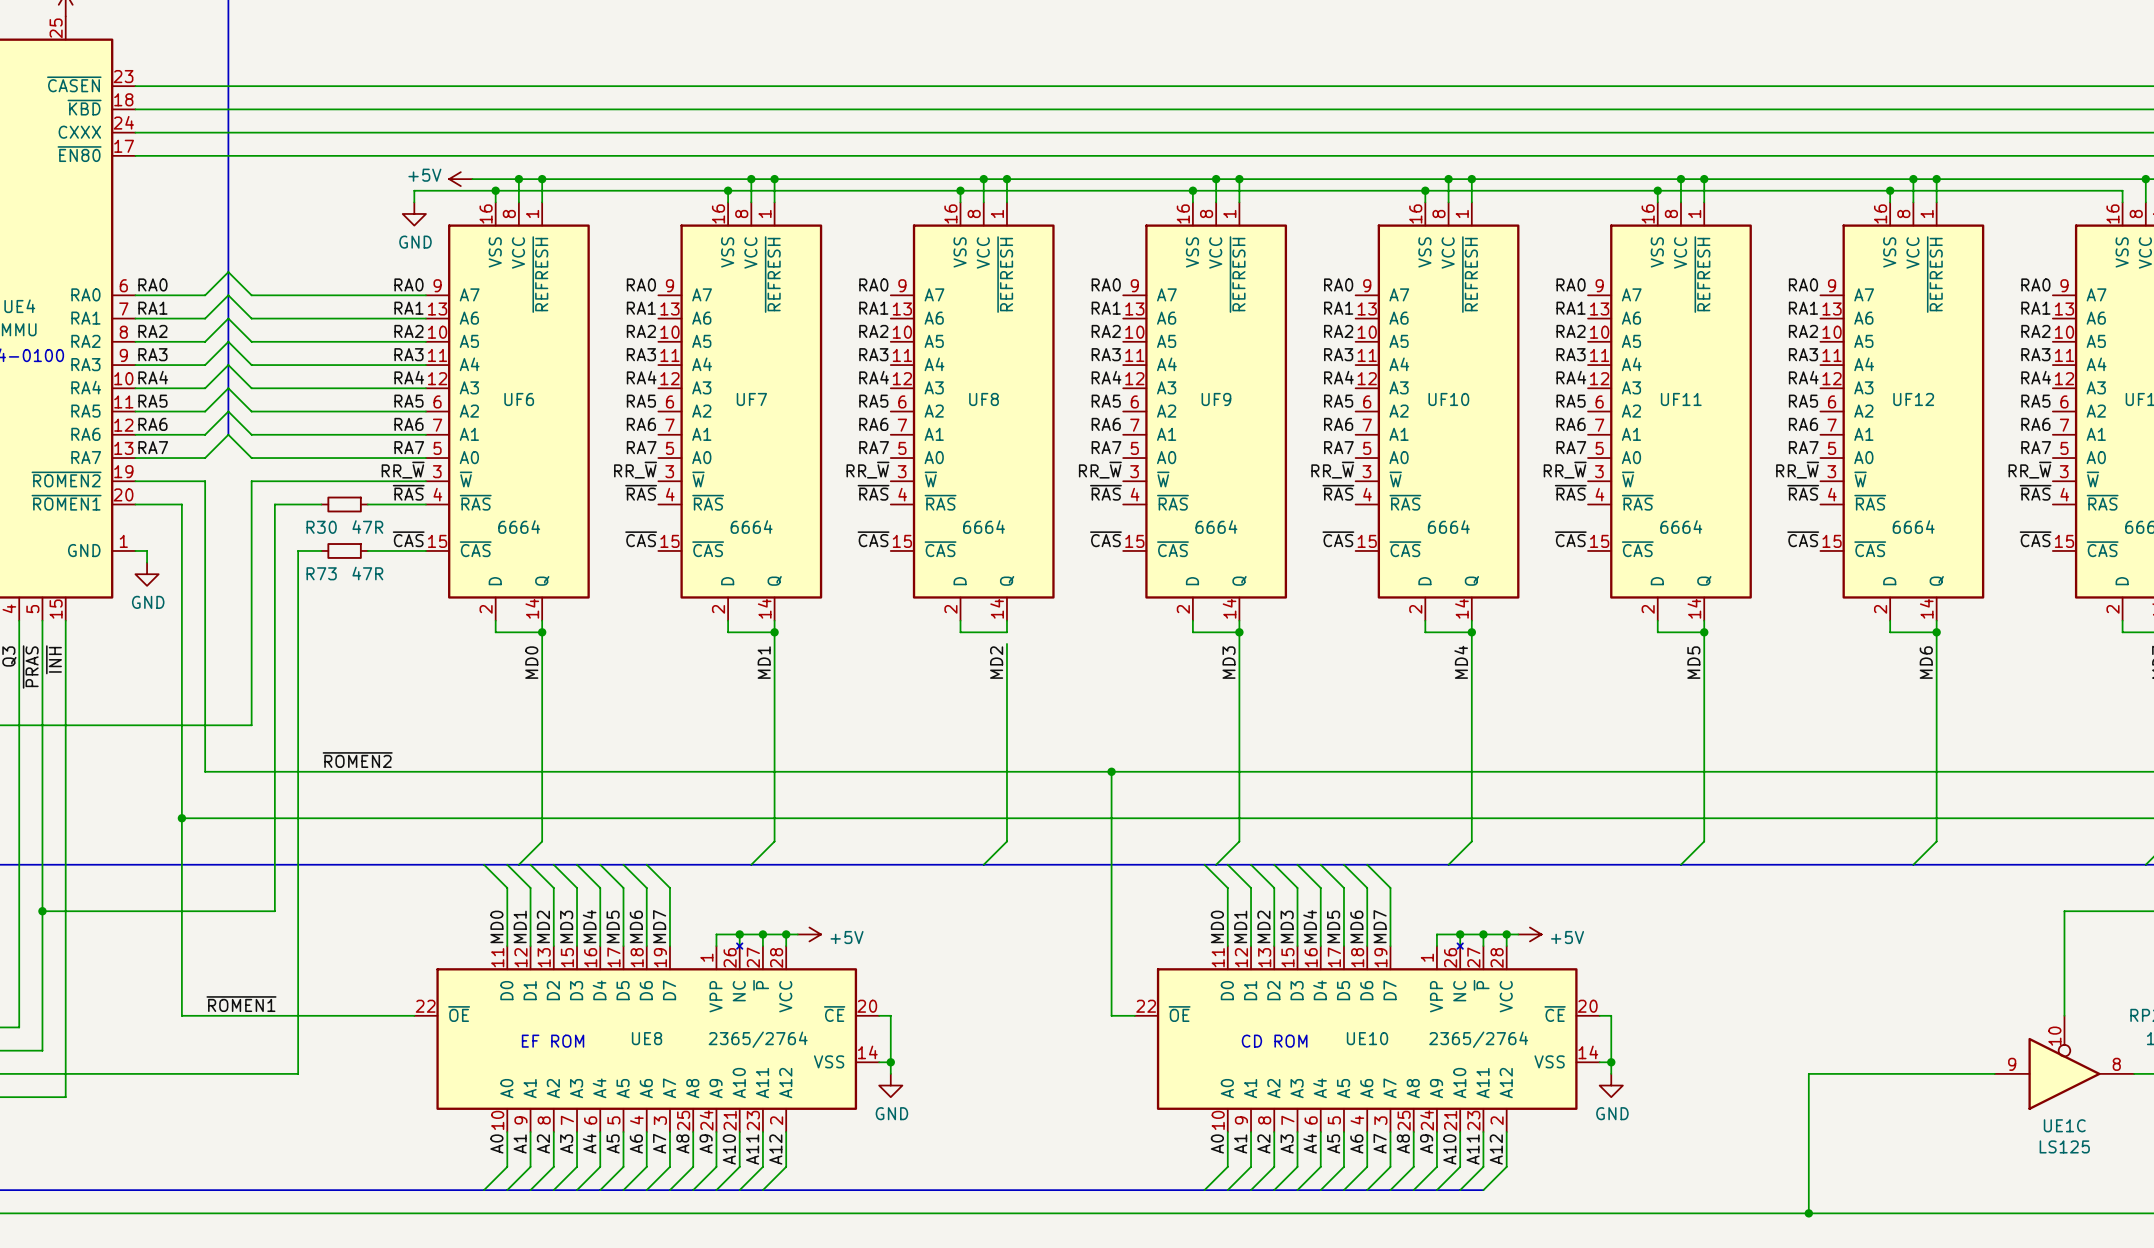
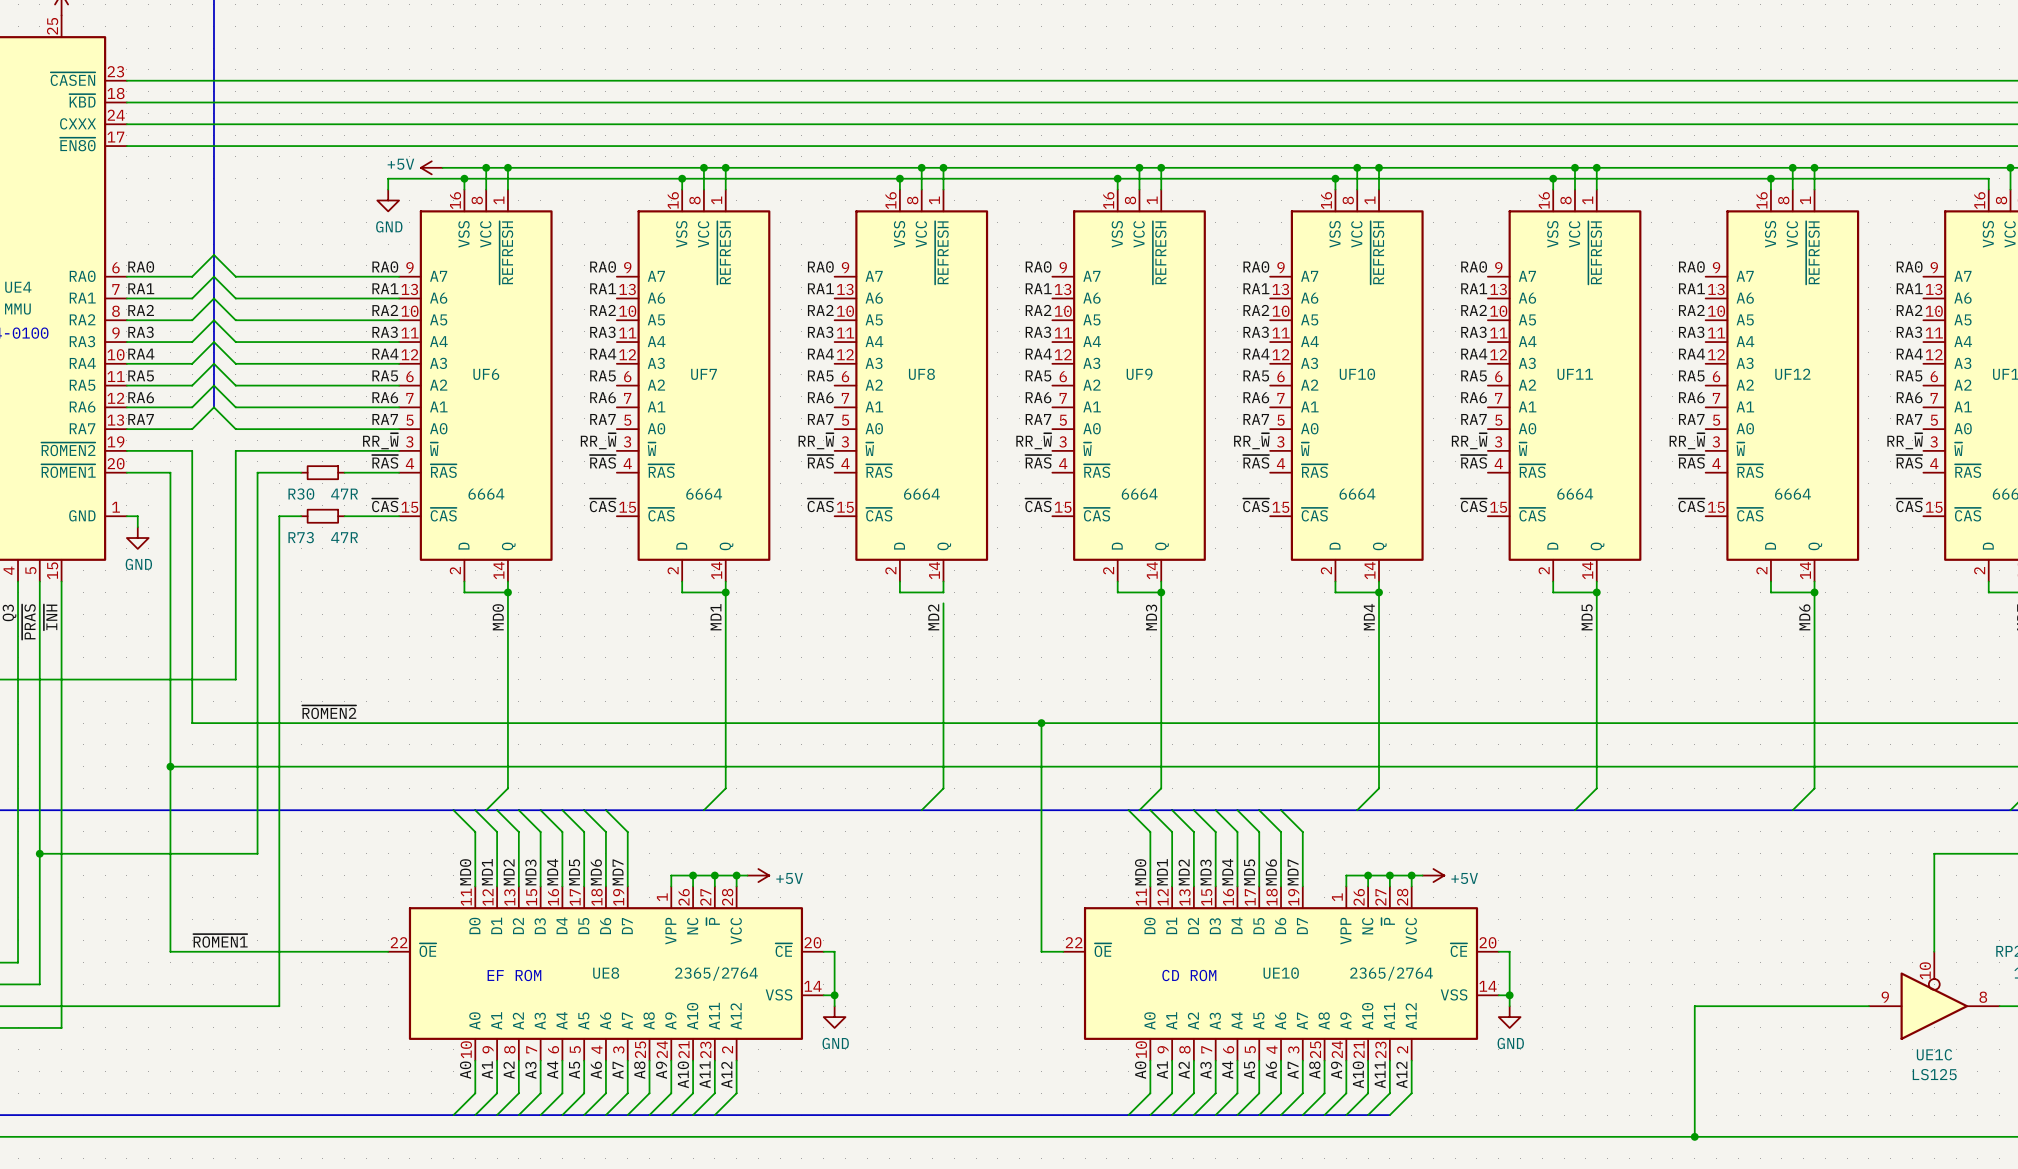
UE8 symbol: [414, 943, 880, 1133] -> [388, 886, 824, 1061]
UE10 symbol: [1134, 943, 1600, 1133] -> [1063, 886, 1499, 1061]

